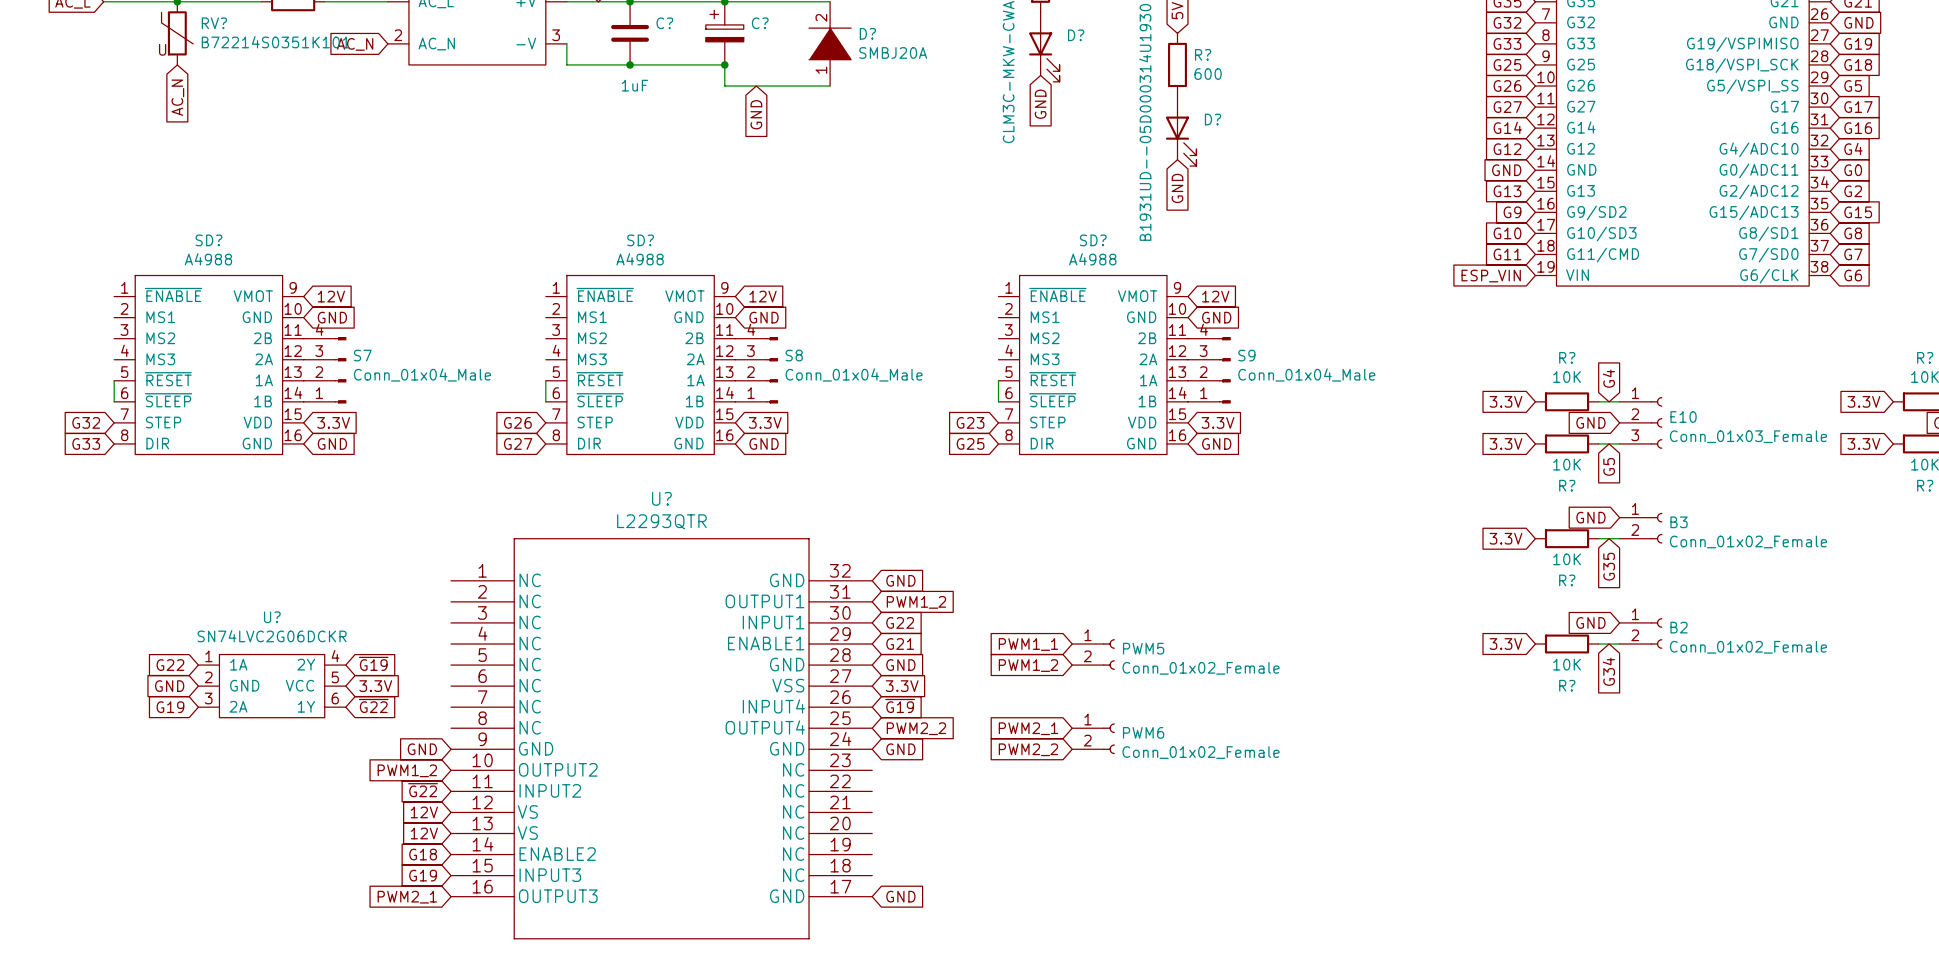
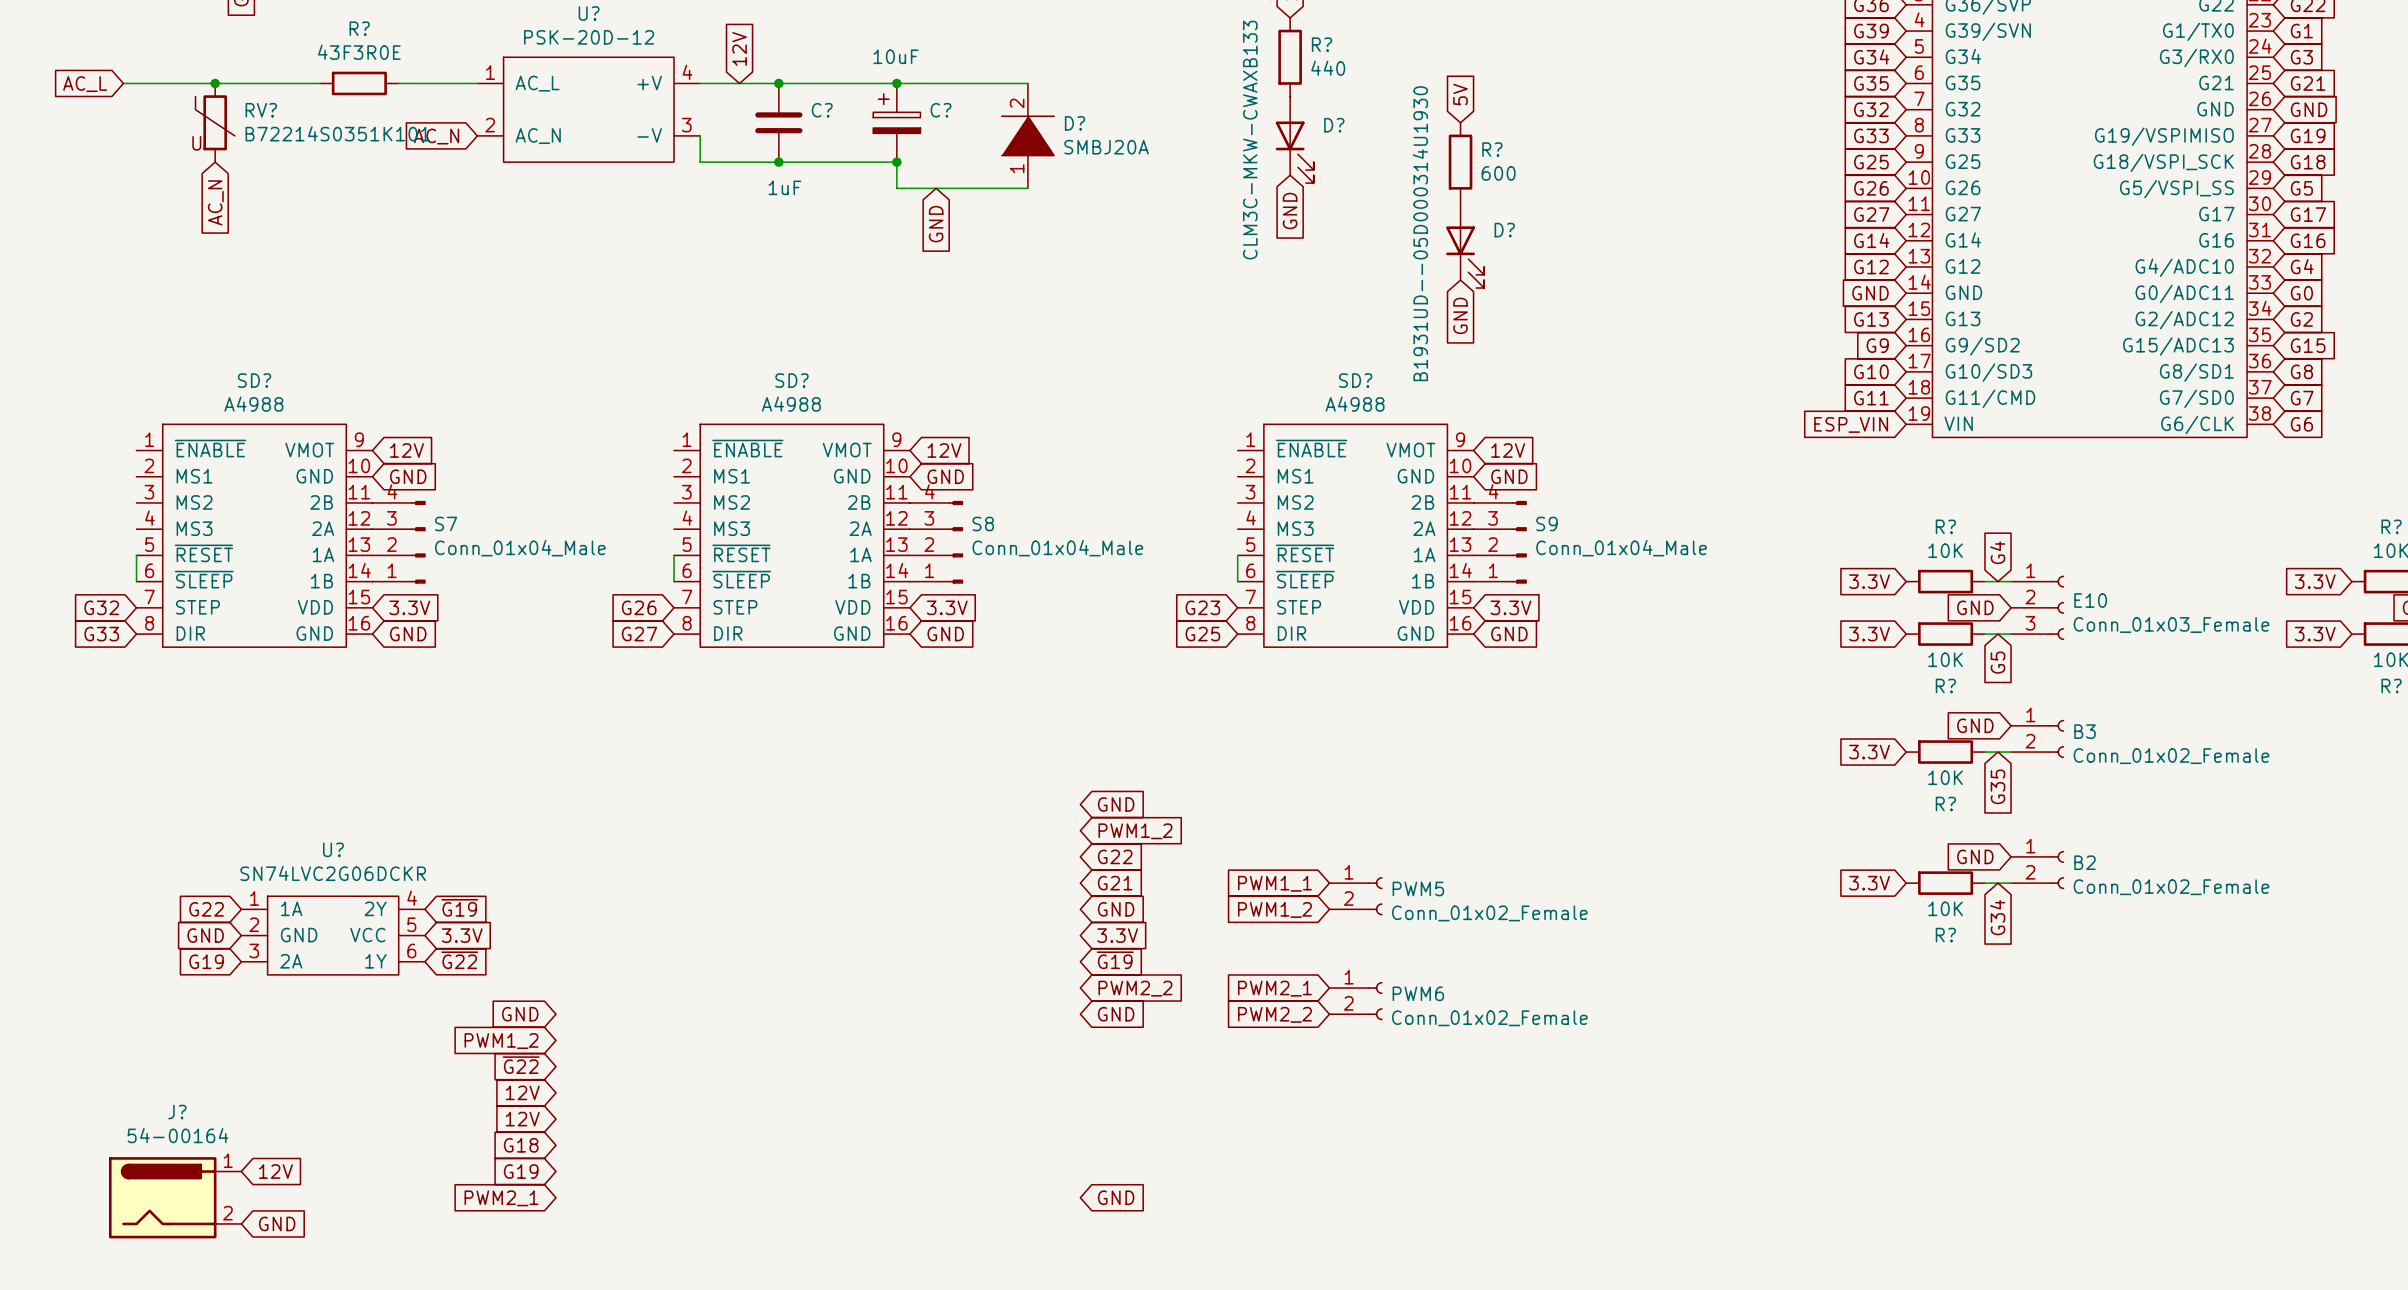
U?: L2293QTR (661, 738) -> none
global label: none -> 12V (275, 1171)
J?: none -> 54-00164 (175, 1197)
global label: none -> GND (277, 1223)

